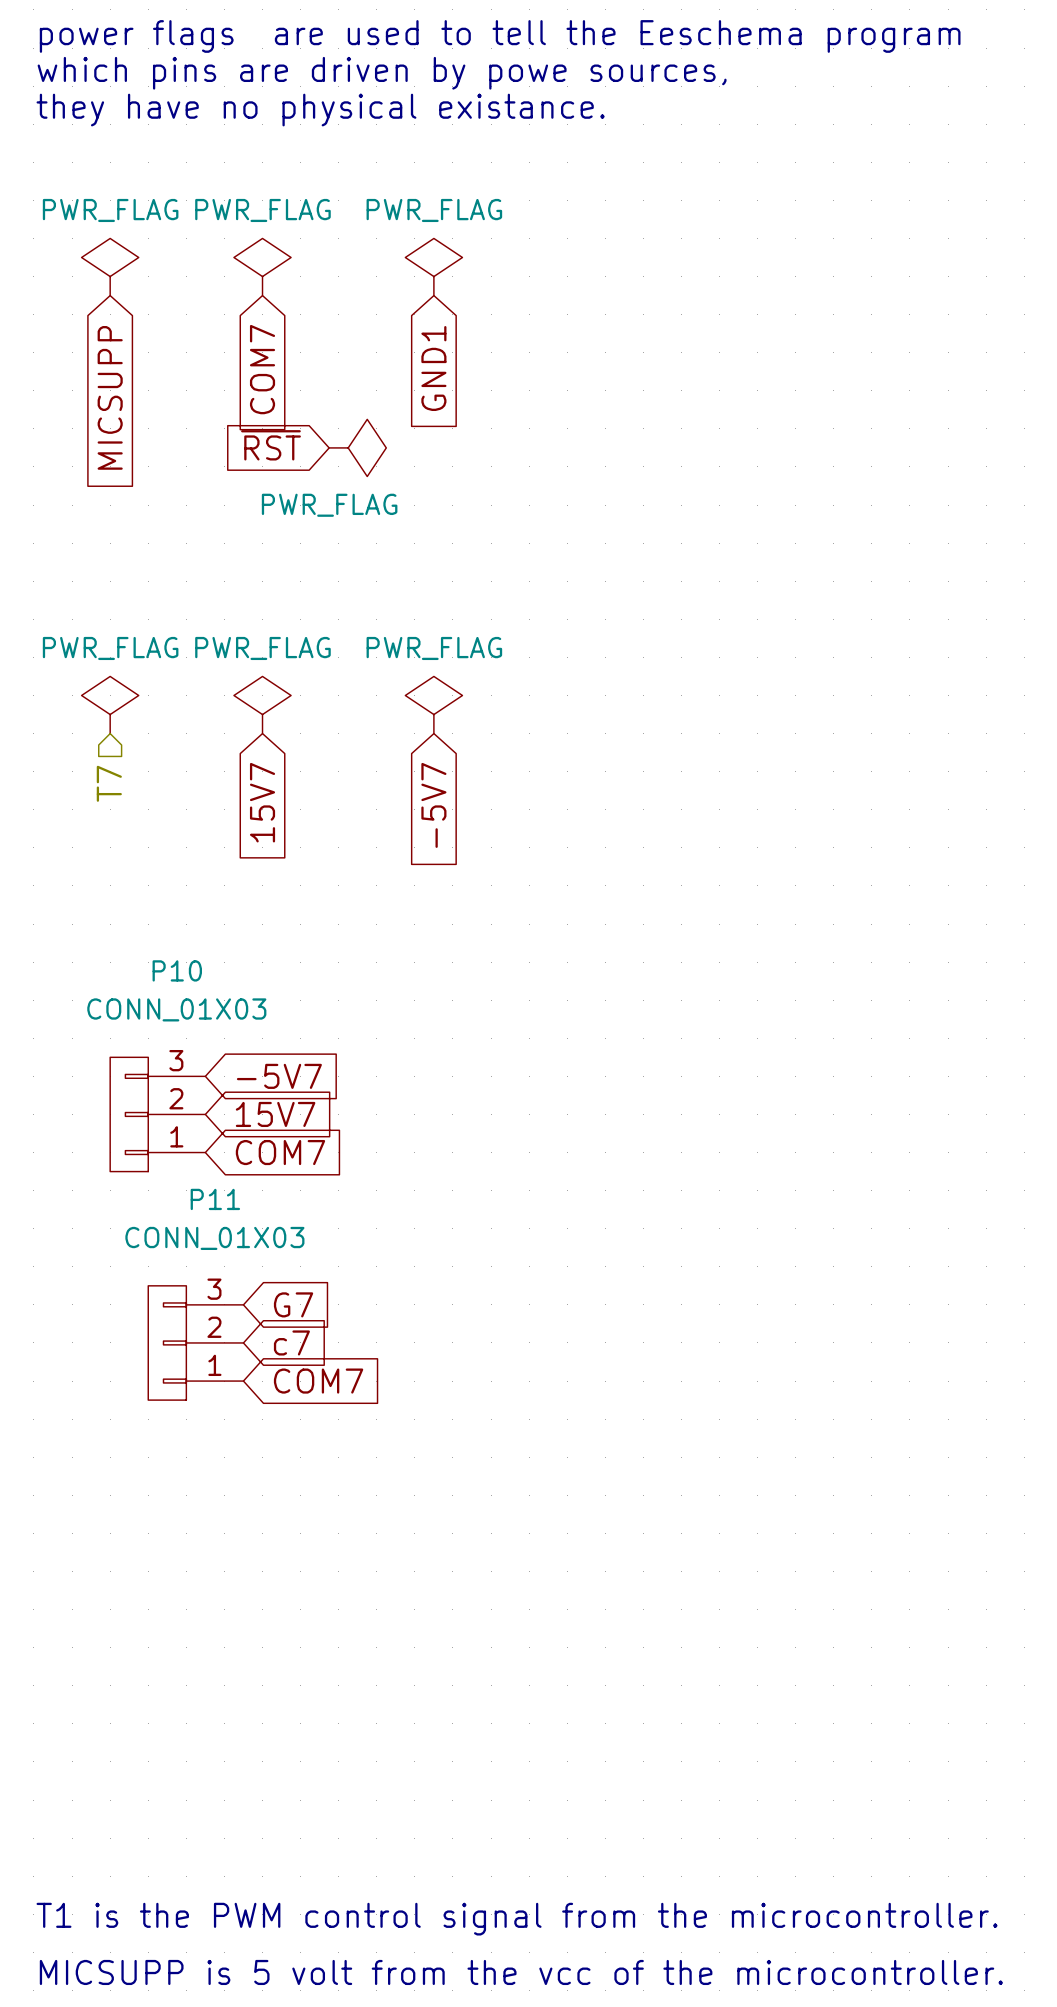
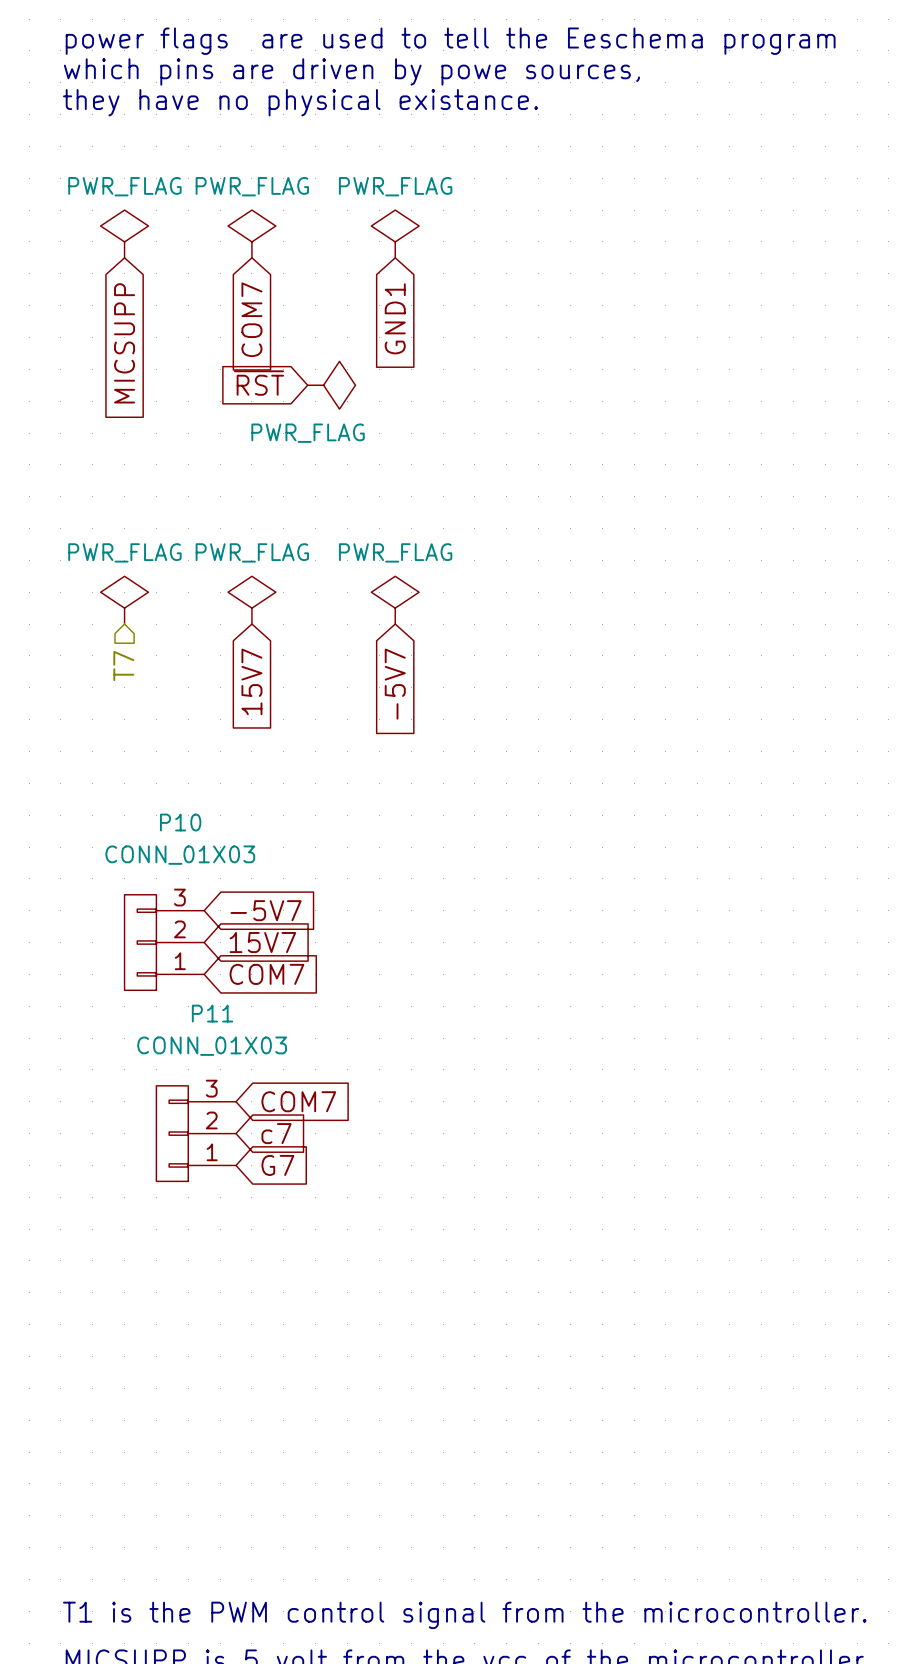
global label: G7 (293, 1304) -> COM7 (298, 1101)
global label: COM7 (318, 1381) -> G7 (277, 1165)

